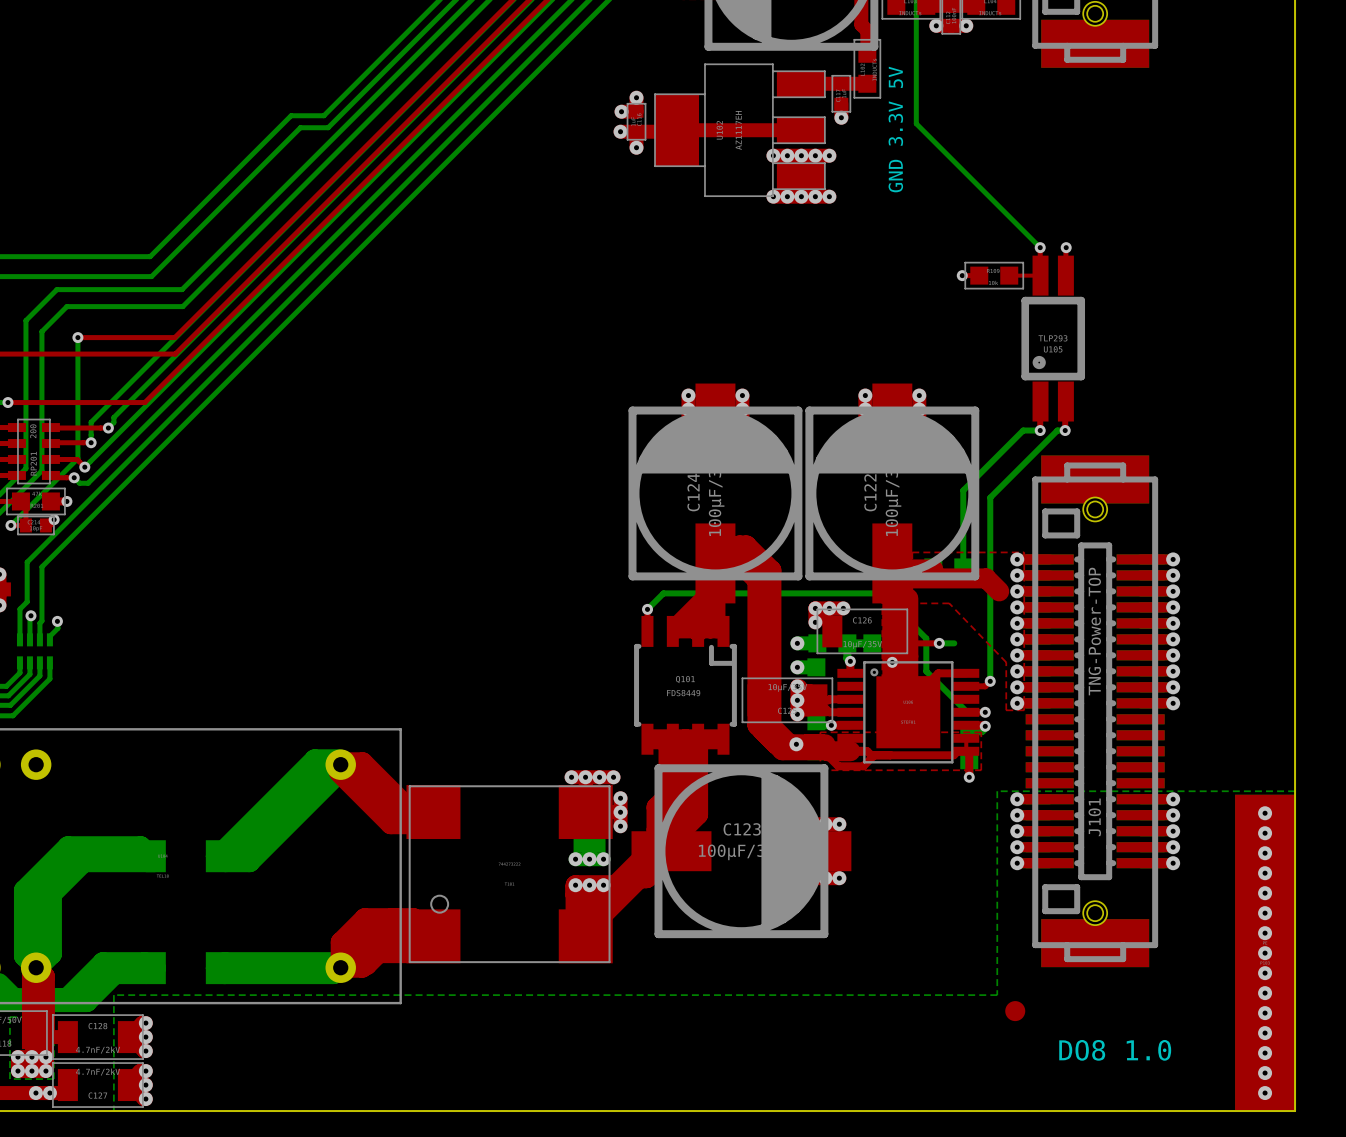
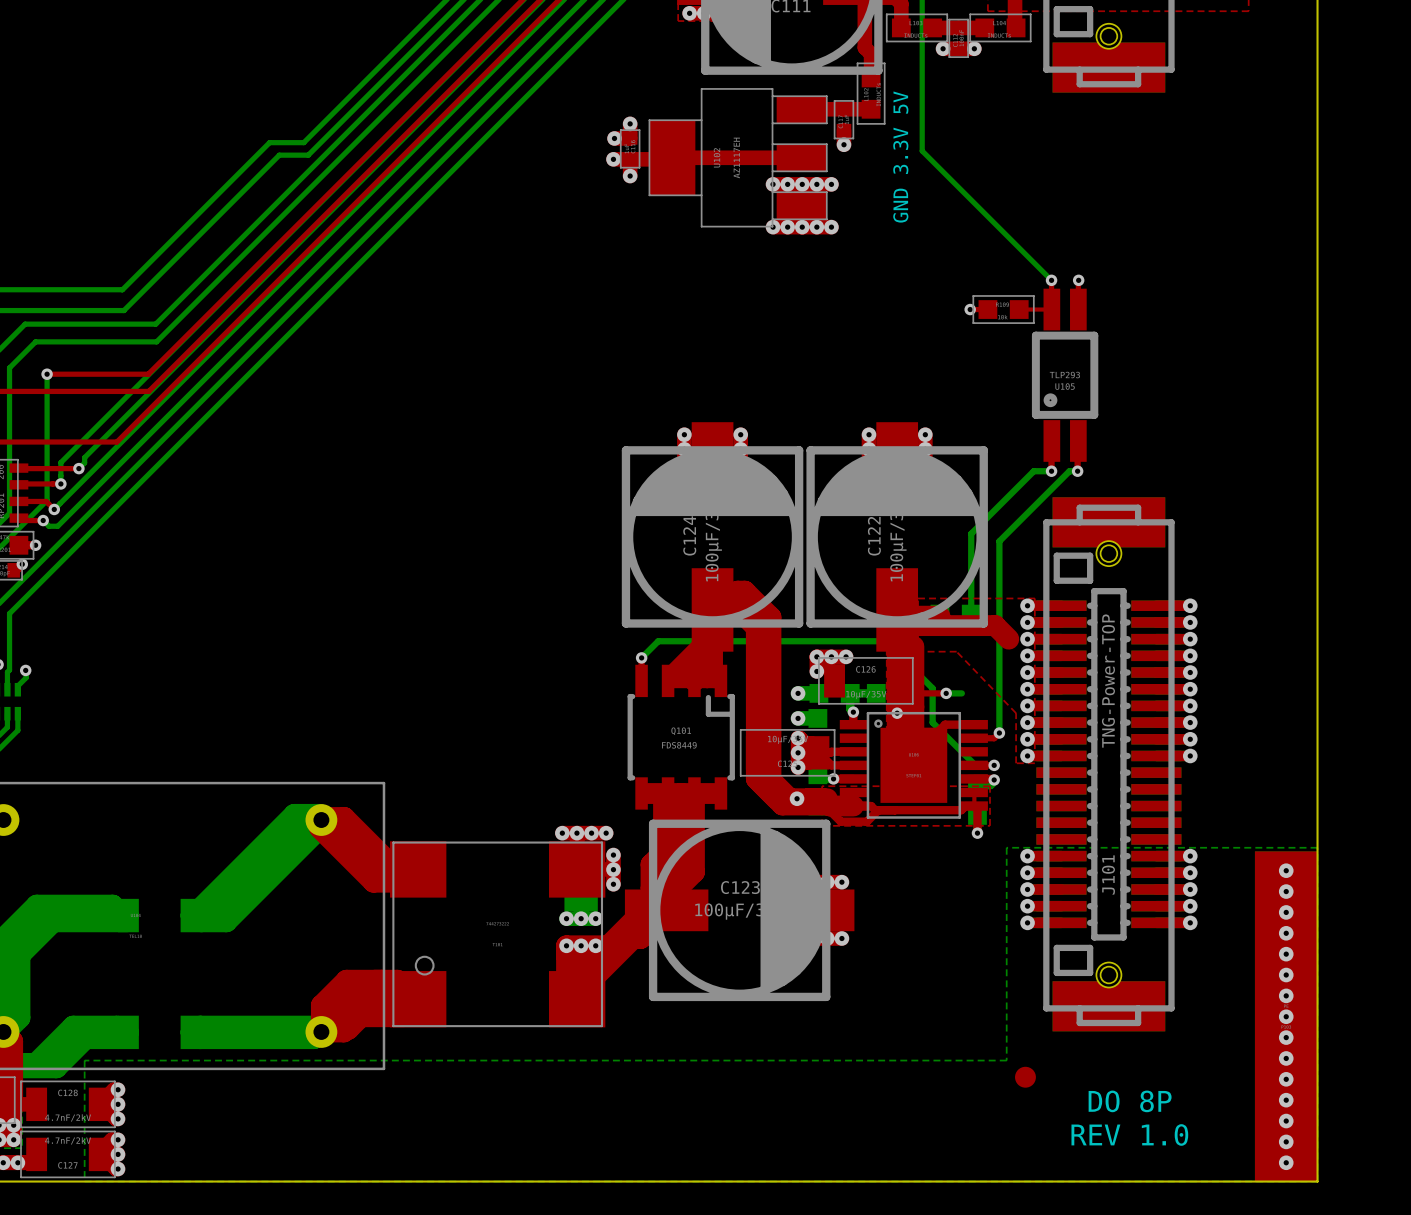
text: none -> DO 8P (1130, 1101)
text: DO8 1.0 (1115, 1050) -> none
text: none -> REV 1.0 (1129, 1134)

